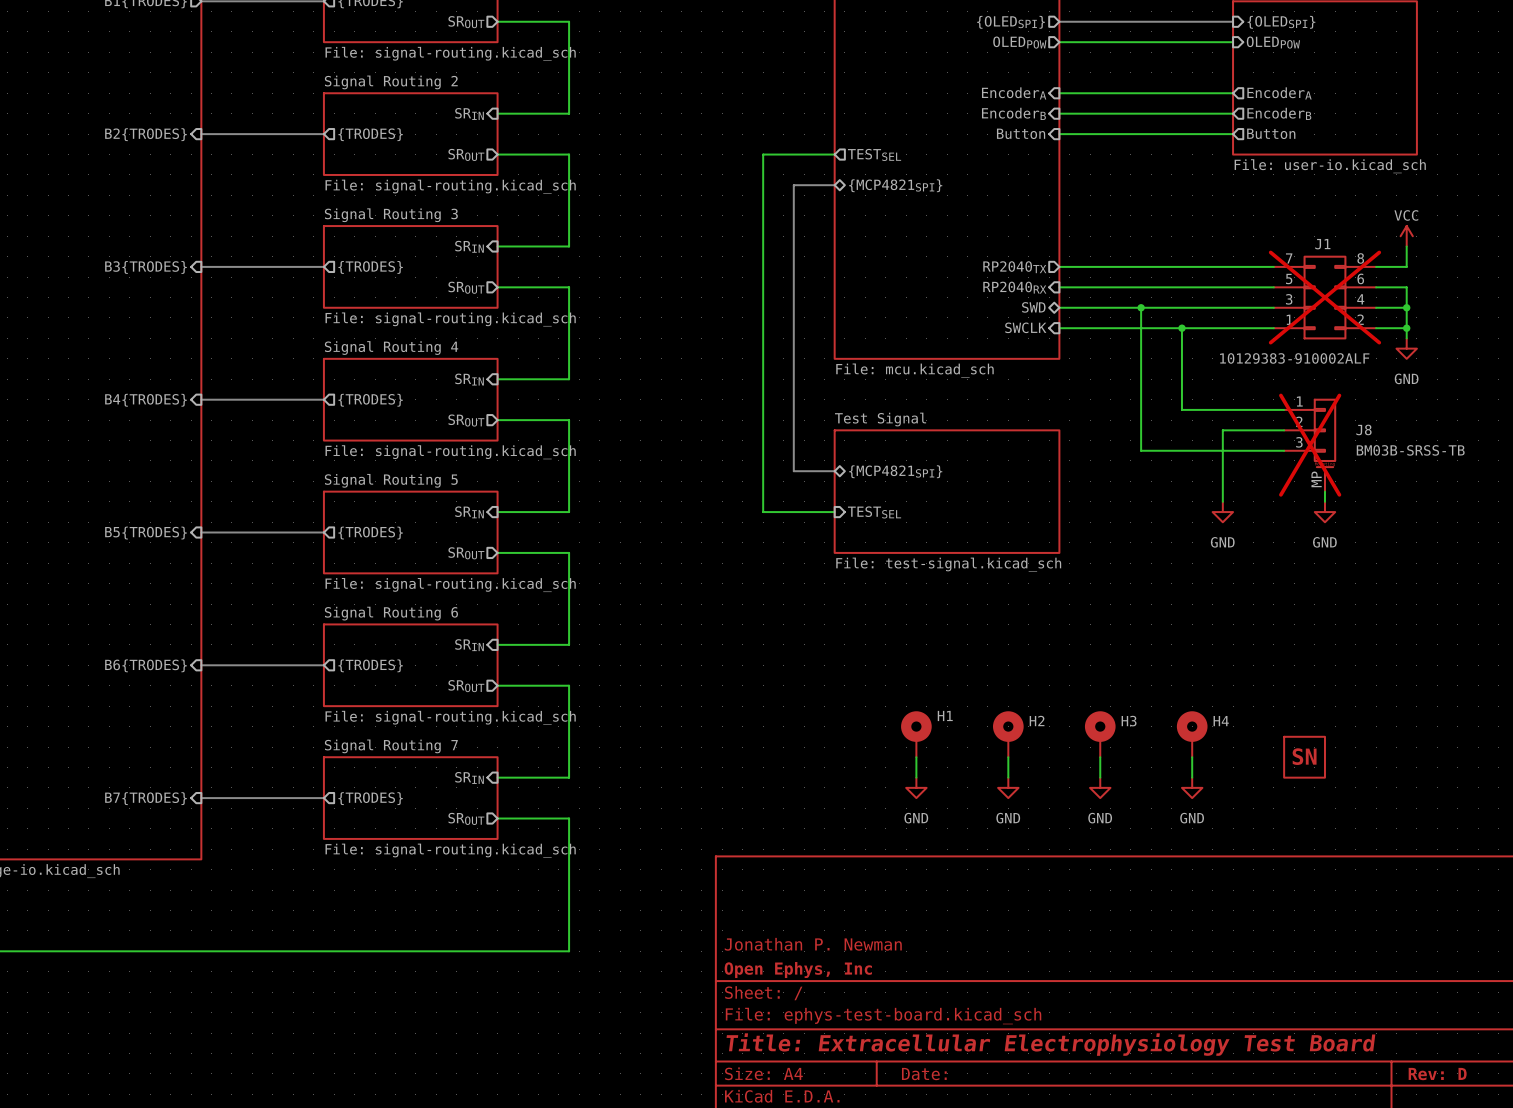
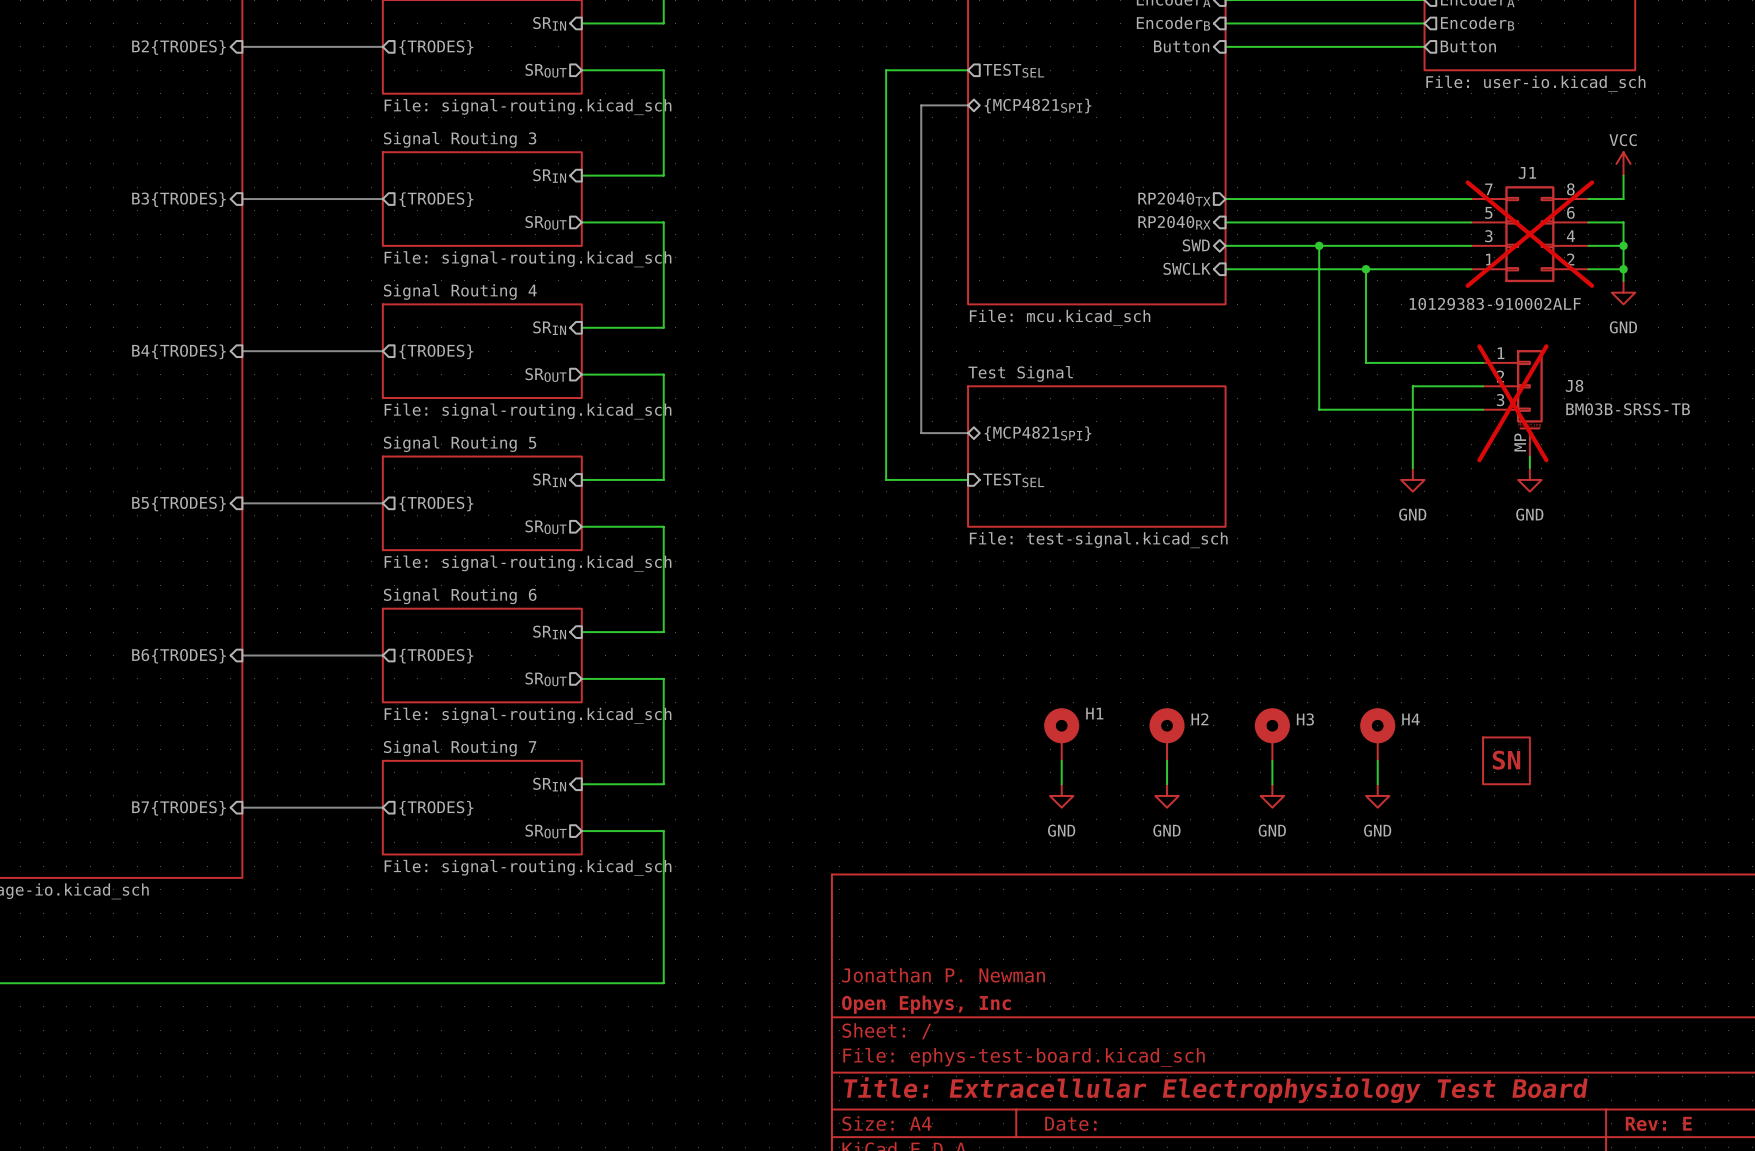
title block: Rev: D (1437, 1074) -> Rev: E (1658, 1123)

